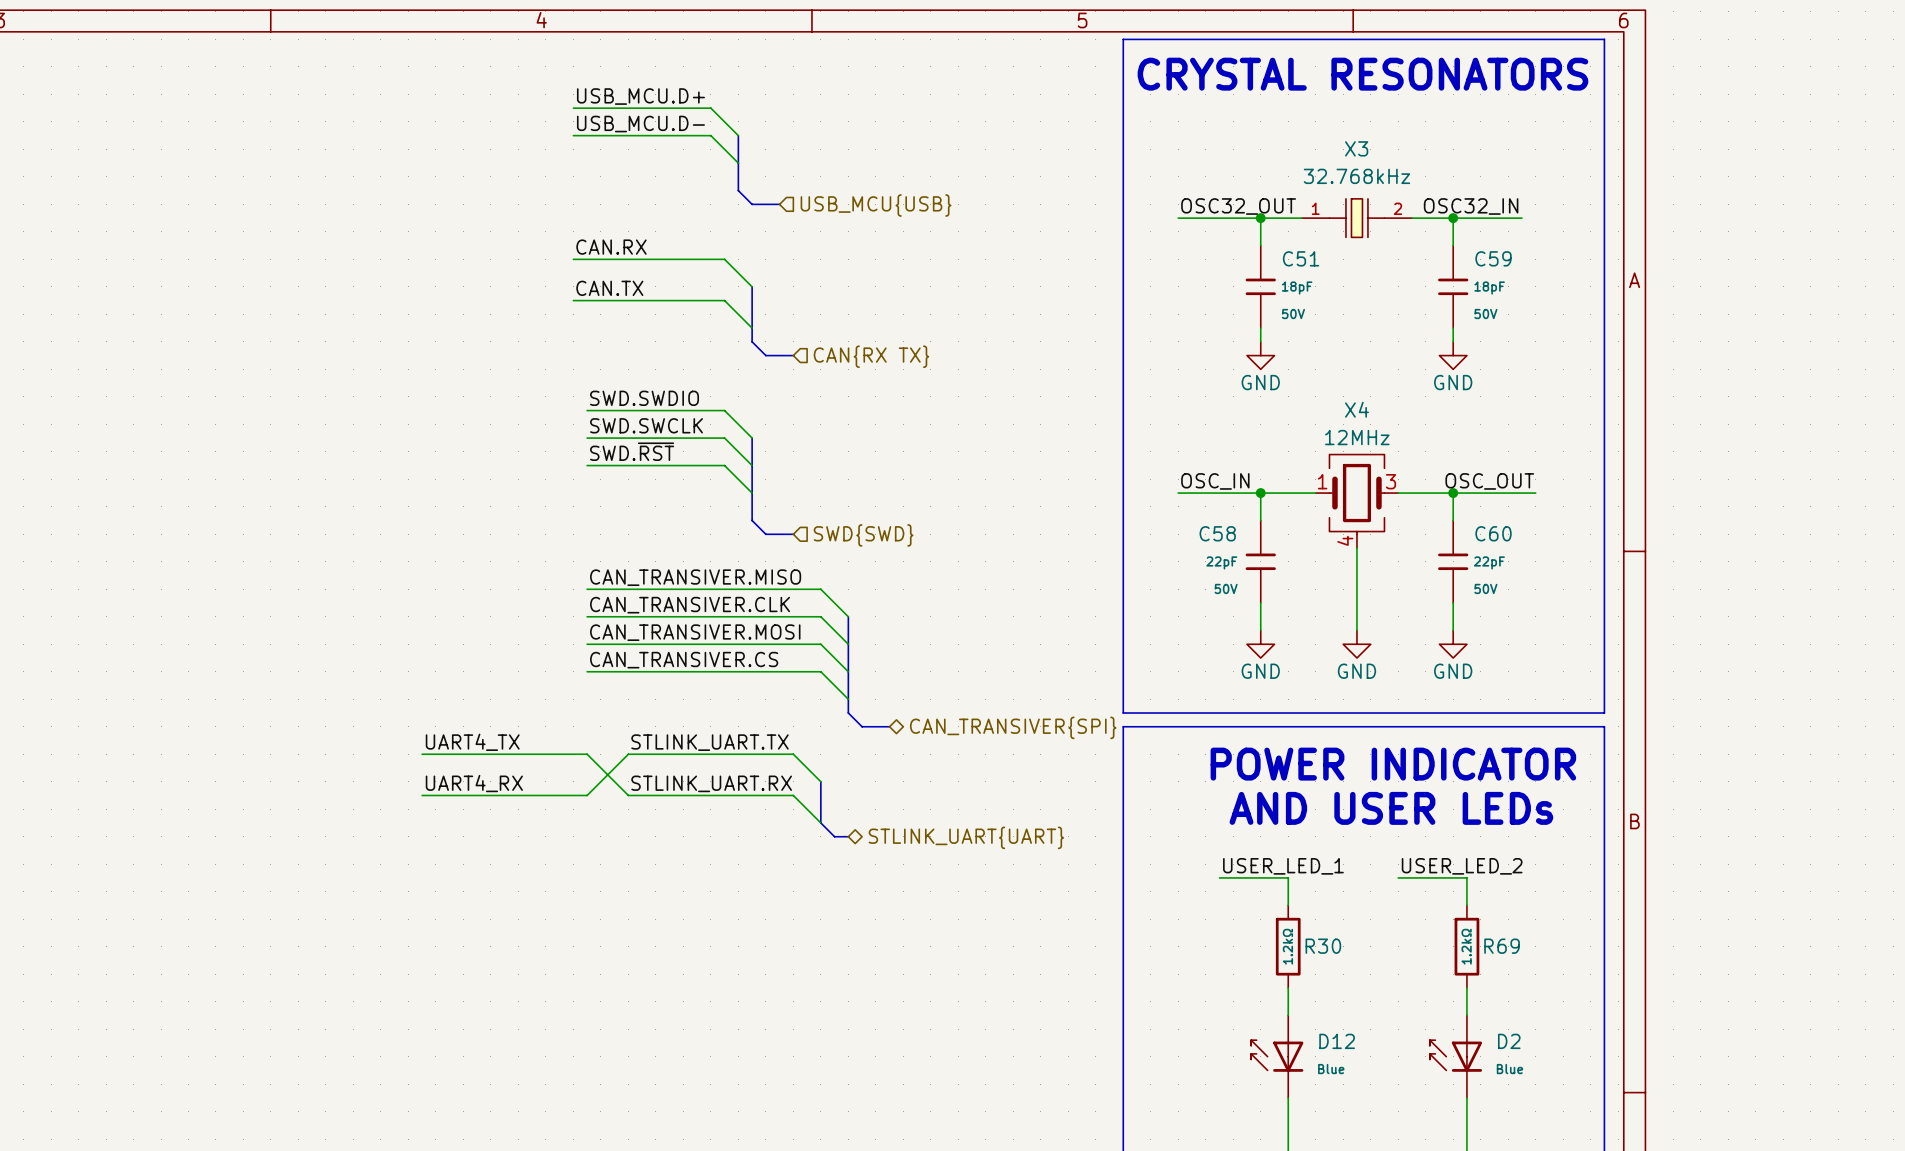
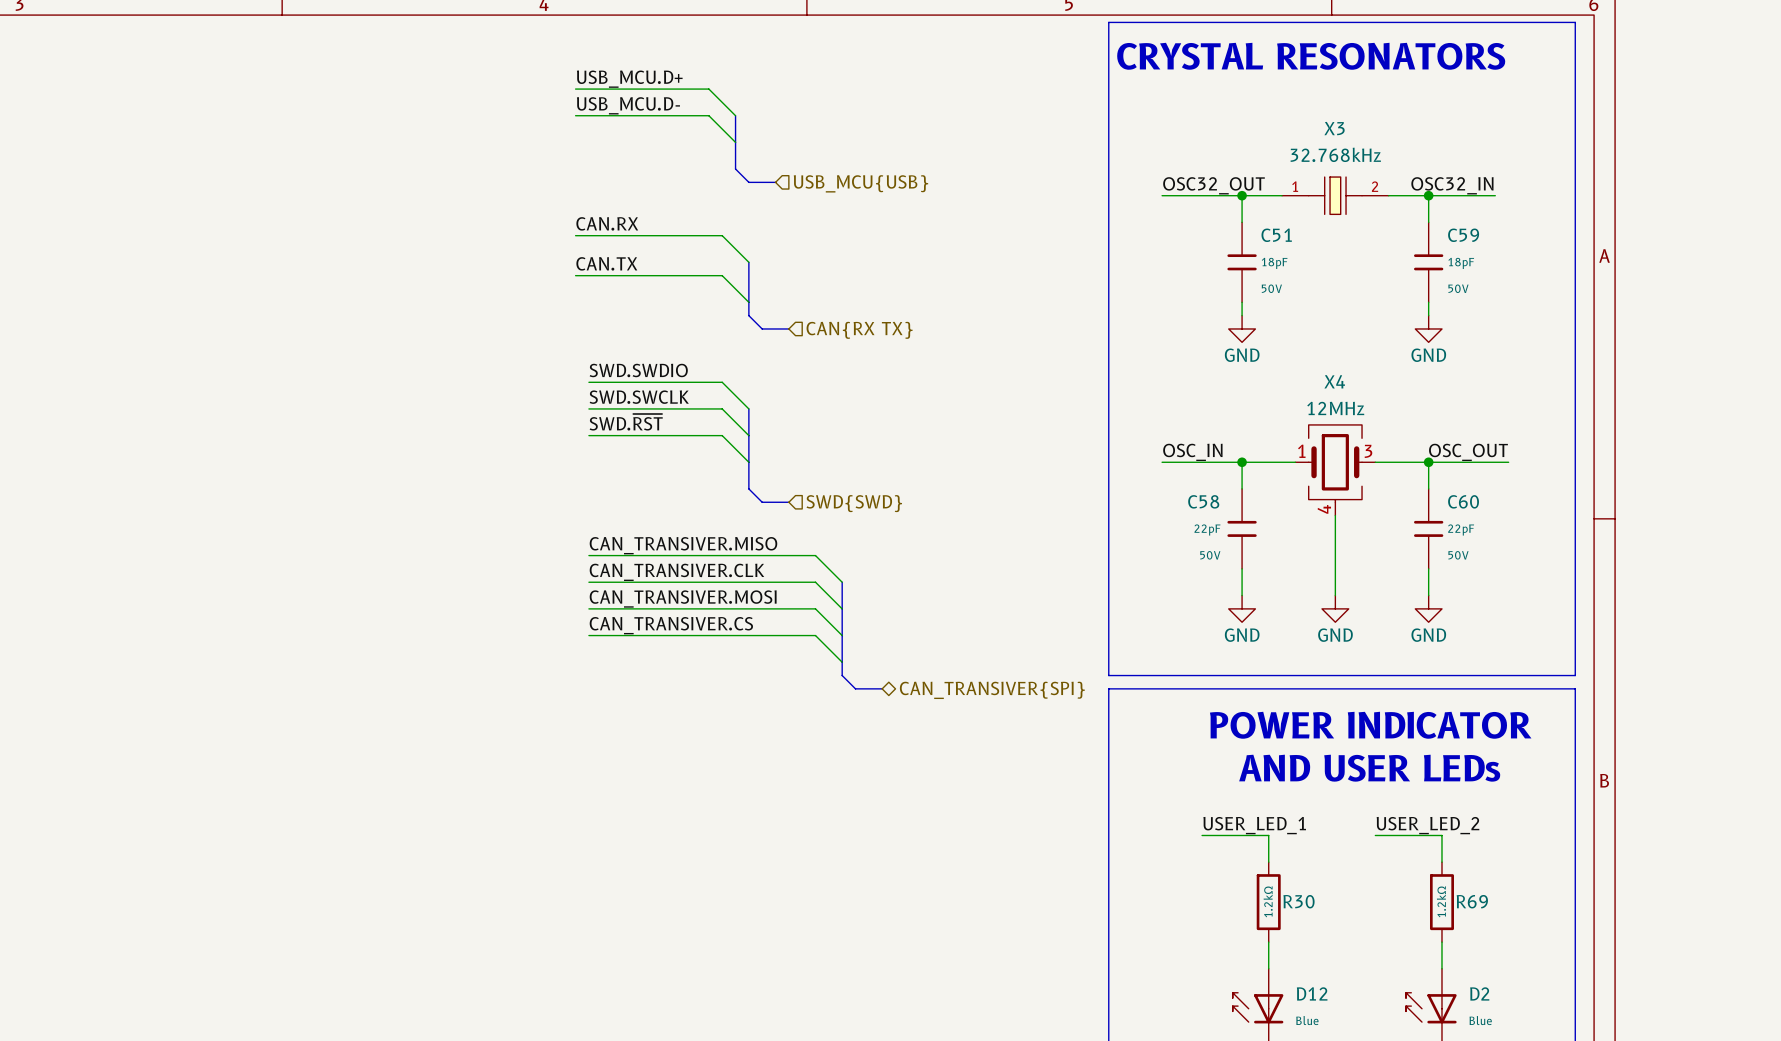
label: UART4_TX (472, 742) -> none
label: STLINK_UART.TX (709, 742) -> none
wire: (422, 754) (587, 754) (628, 795) (793, 795) (820, 822) -> none
wire: (820, 781) (793, 754) (628, 754) (587, 795) (422, 795) -> none
bus: (820, 781) (820, 822) (834, 836) (848, 836) -> none
label: UART4_RX (474, 783) -> none
label: STLINK_UART.RX (711, 783) -> none
hierarchical label: STLINK_UART{UART} (966, 837) -> none

